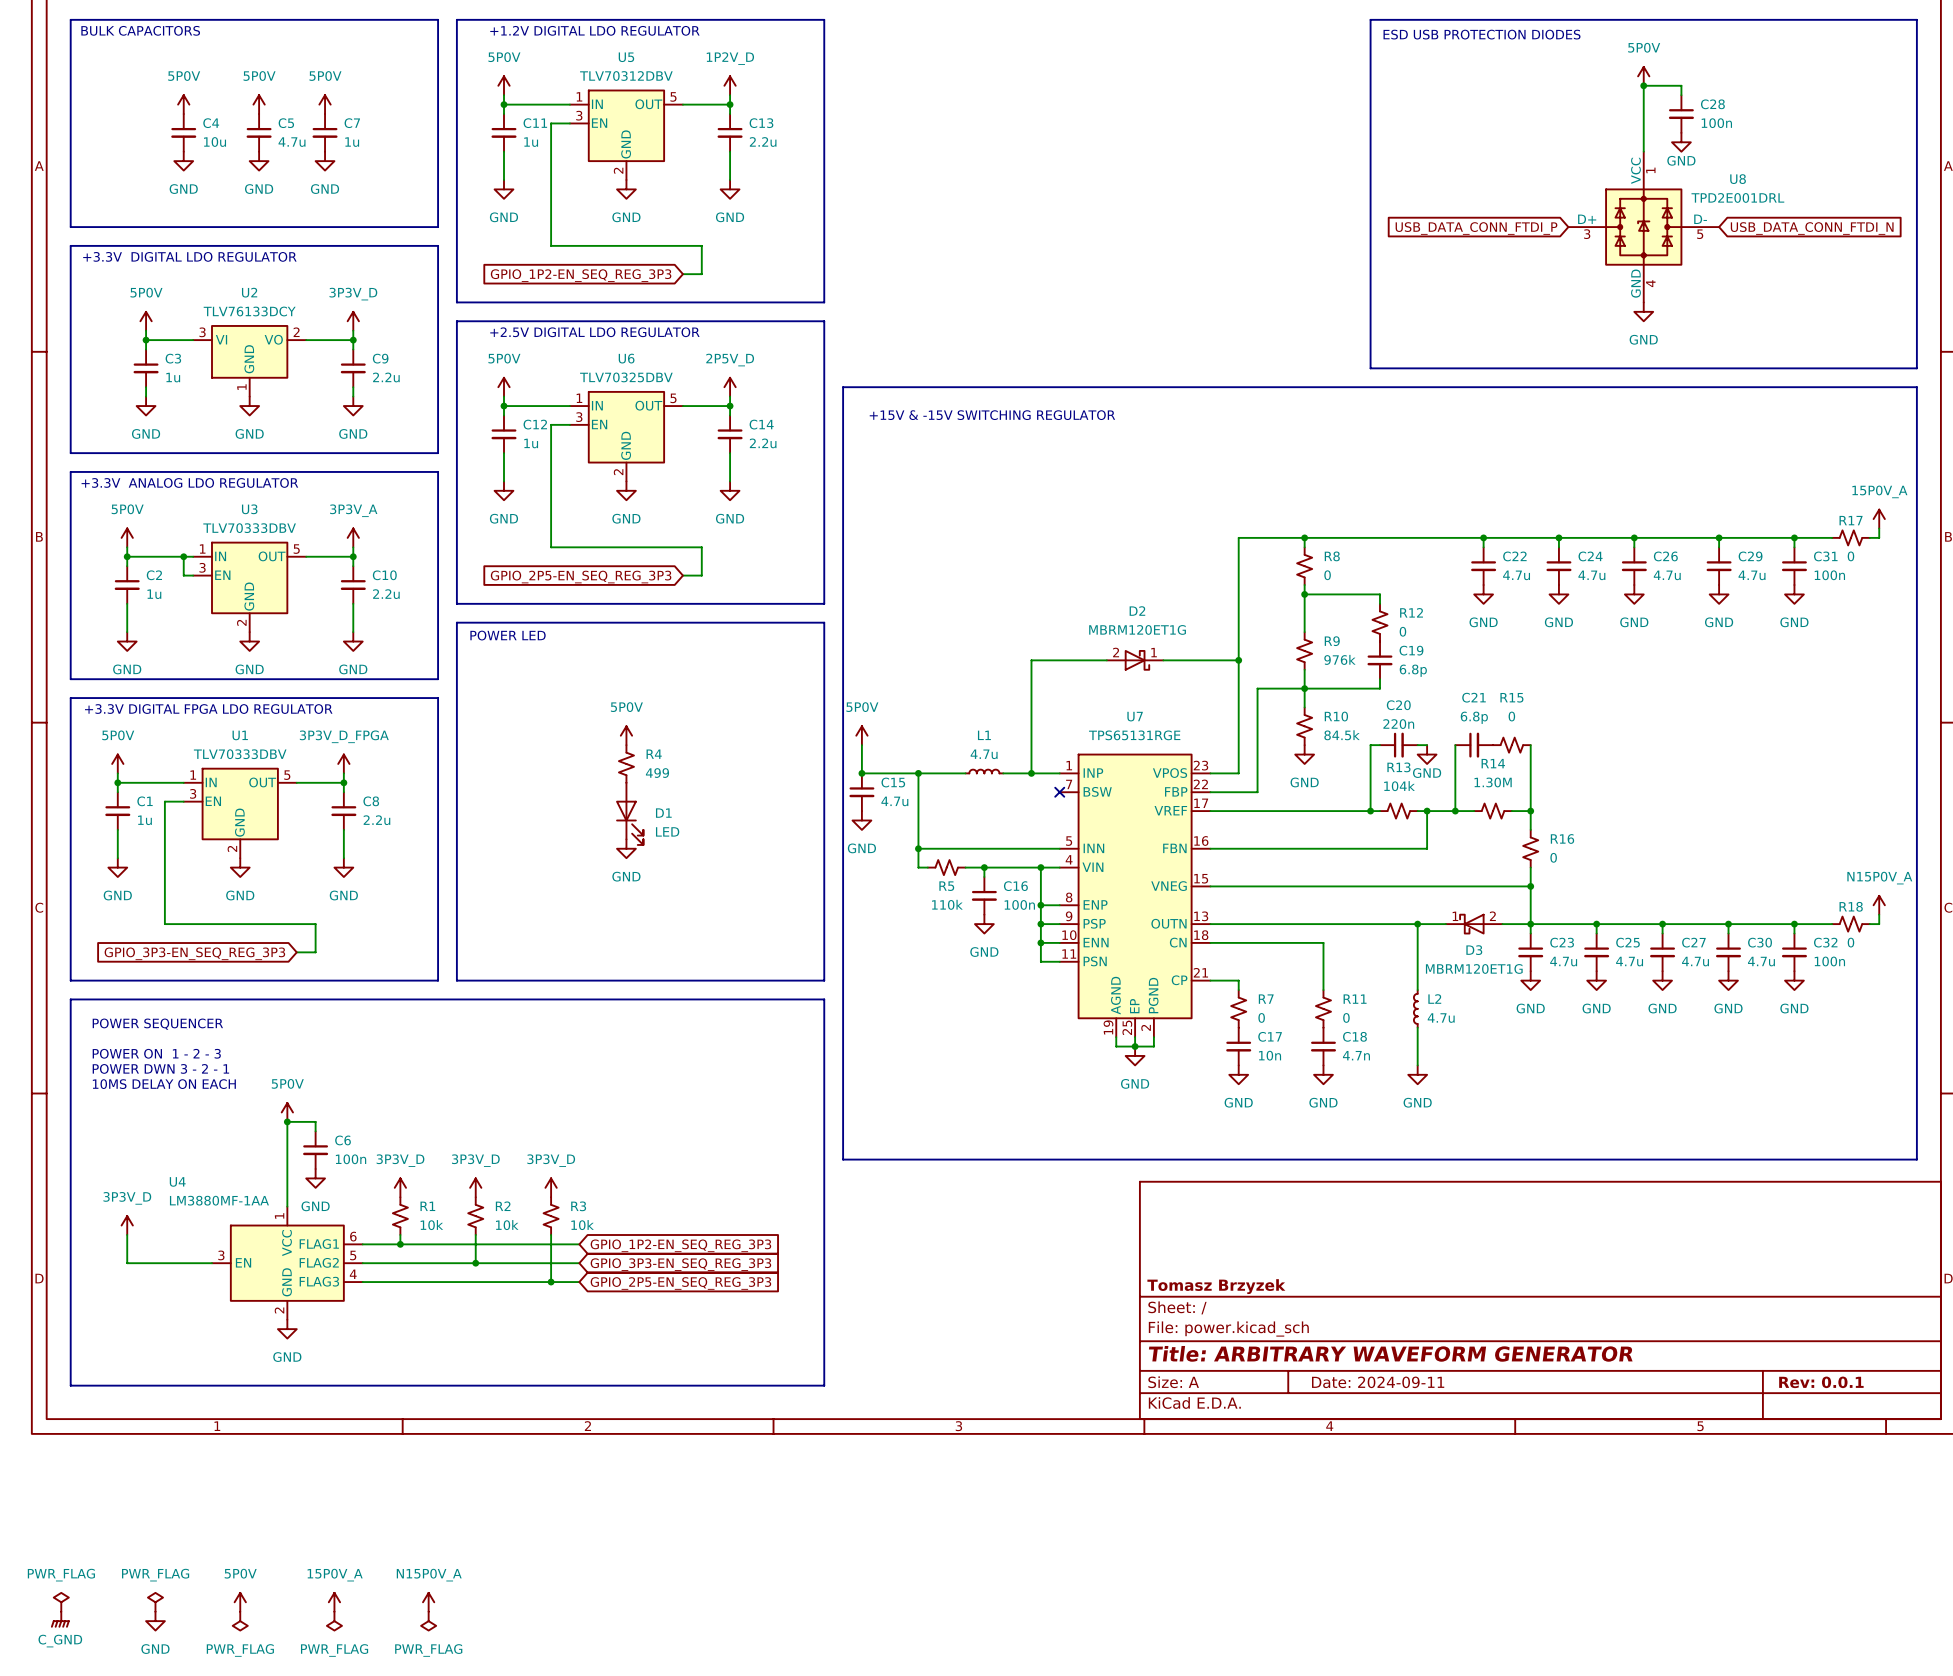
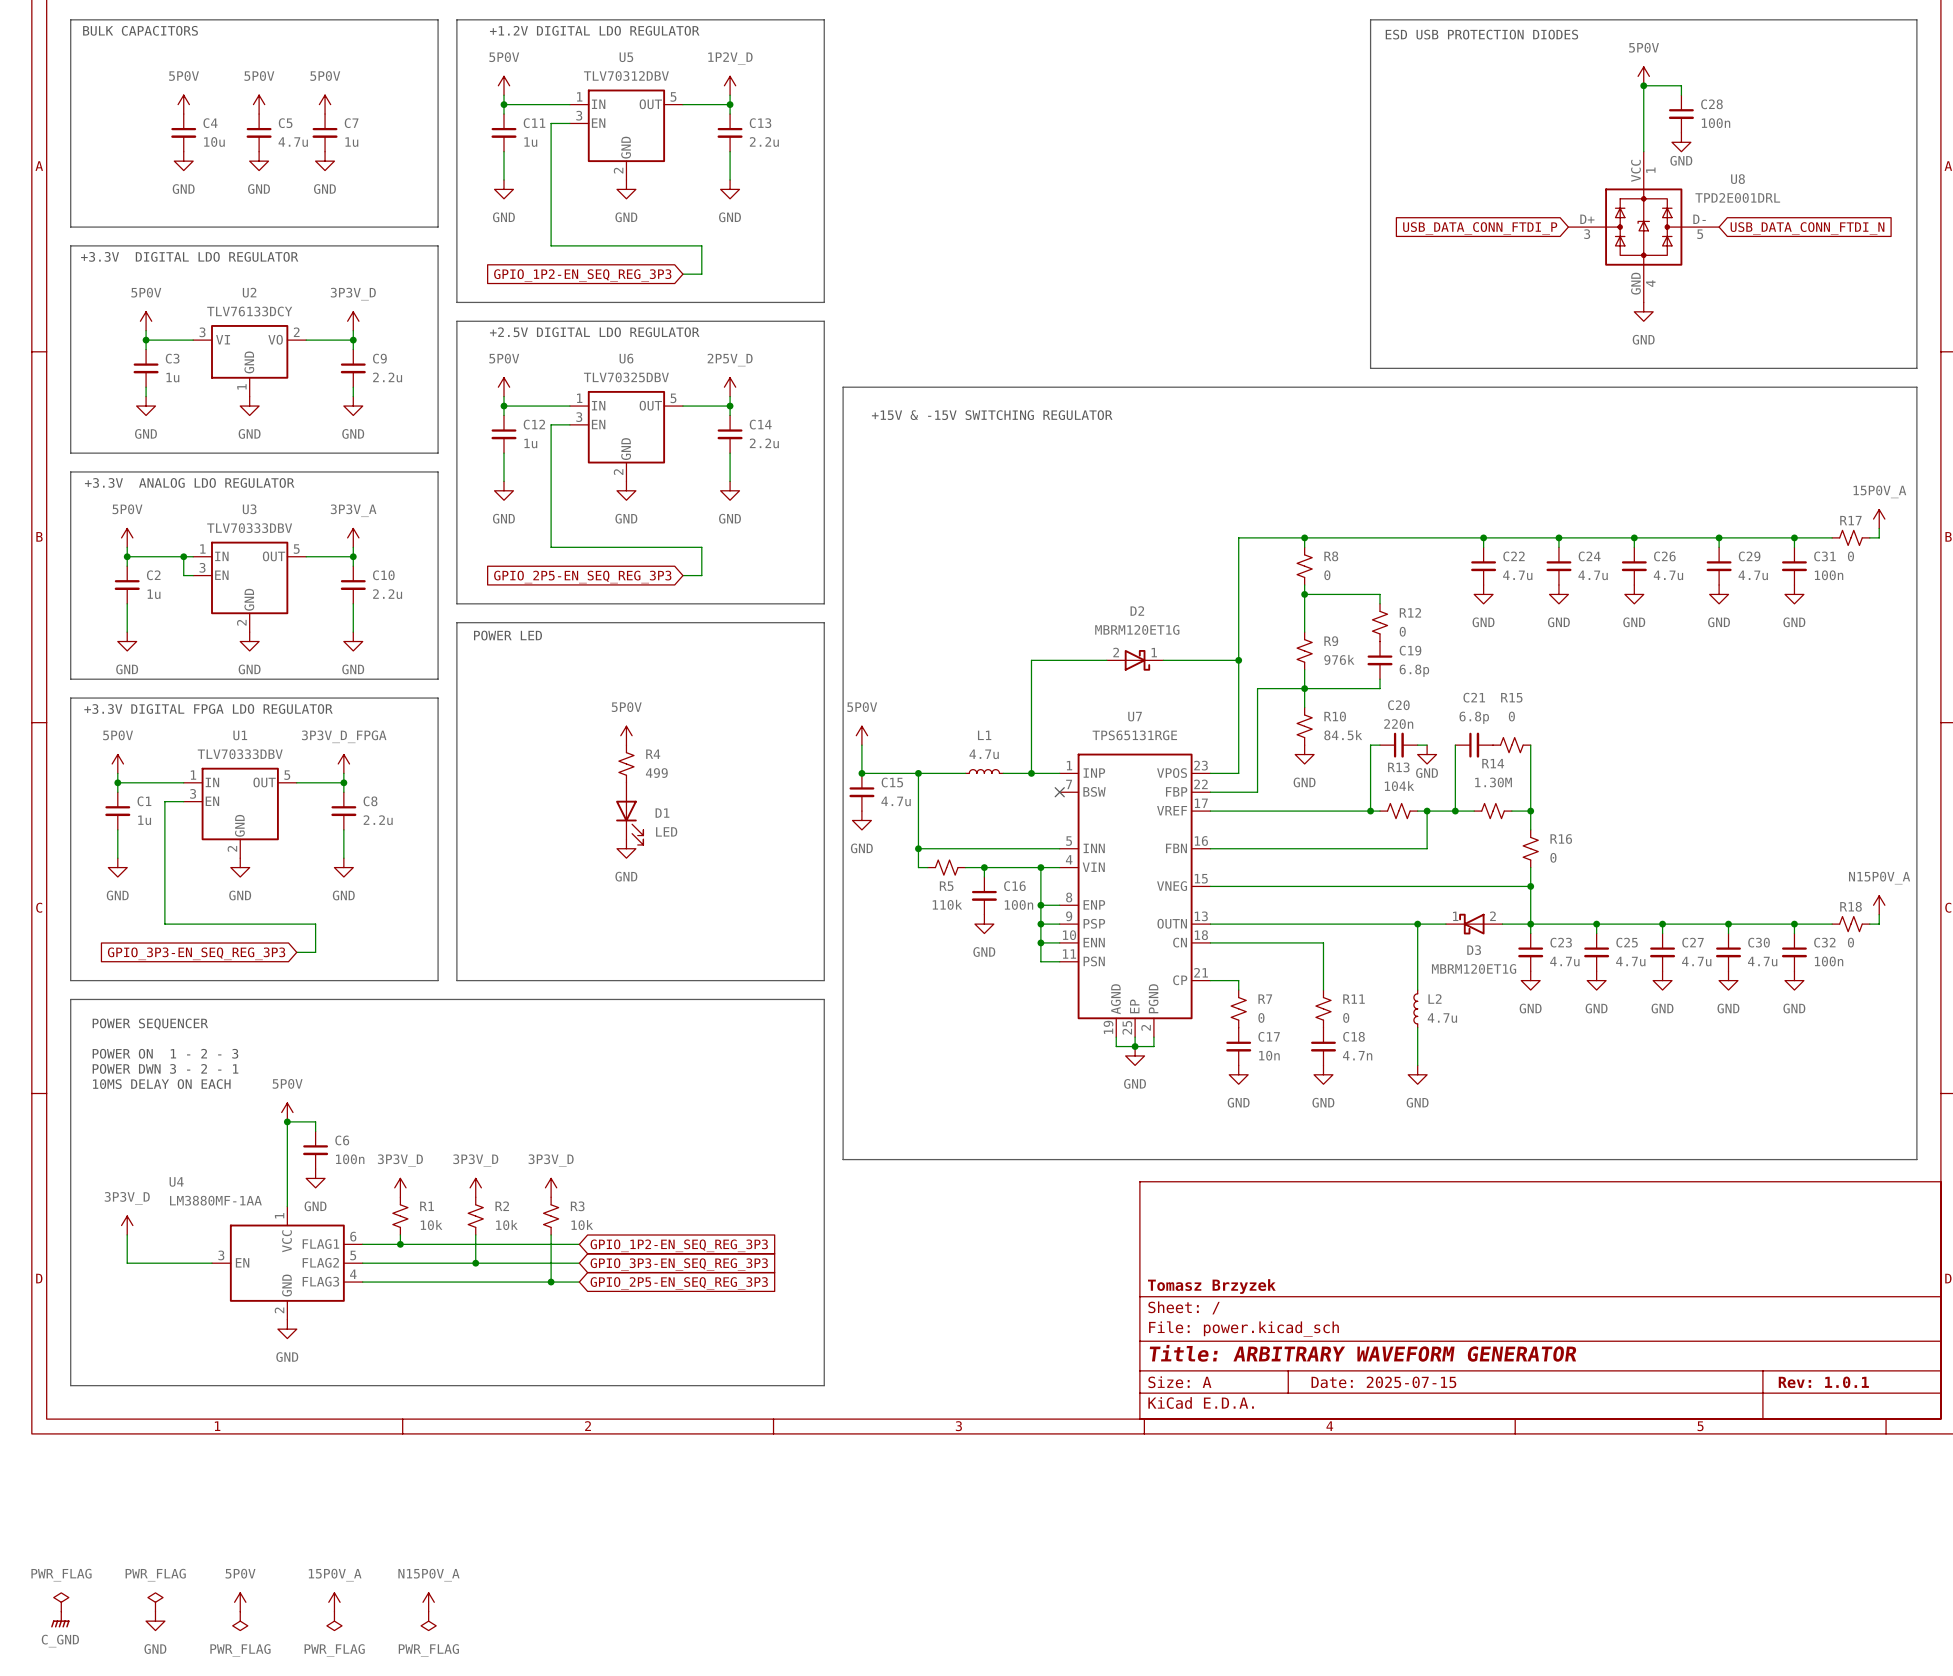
title block: Date: 2024-09-11 (1378, 1382) -> Date: 2025-07-15 (1383, 1382)
title block: Rev: 0.0.1 (1821, 1382) -> Rev: 1.0.1 (1823, 1382)

